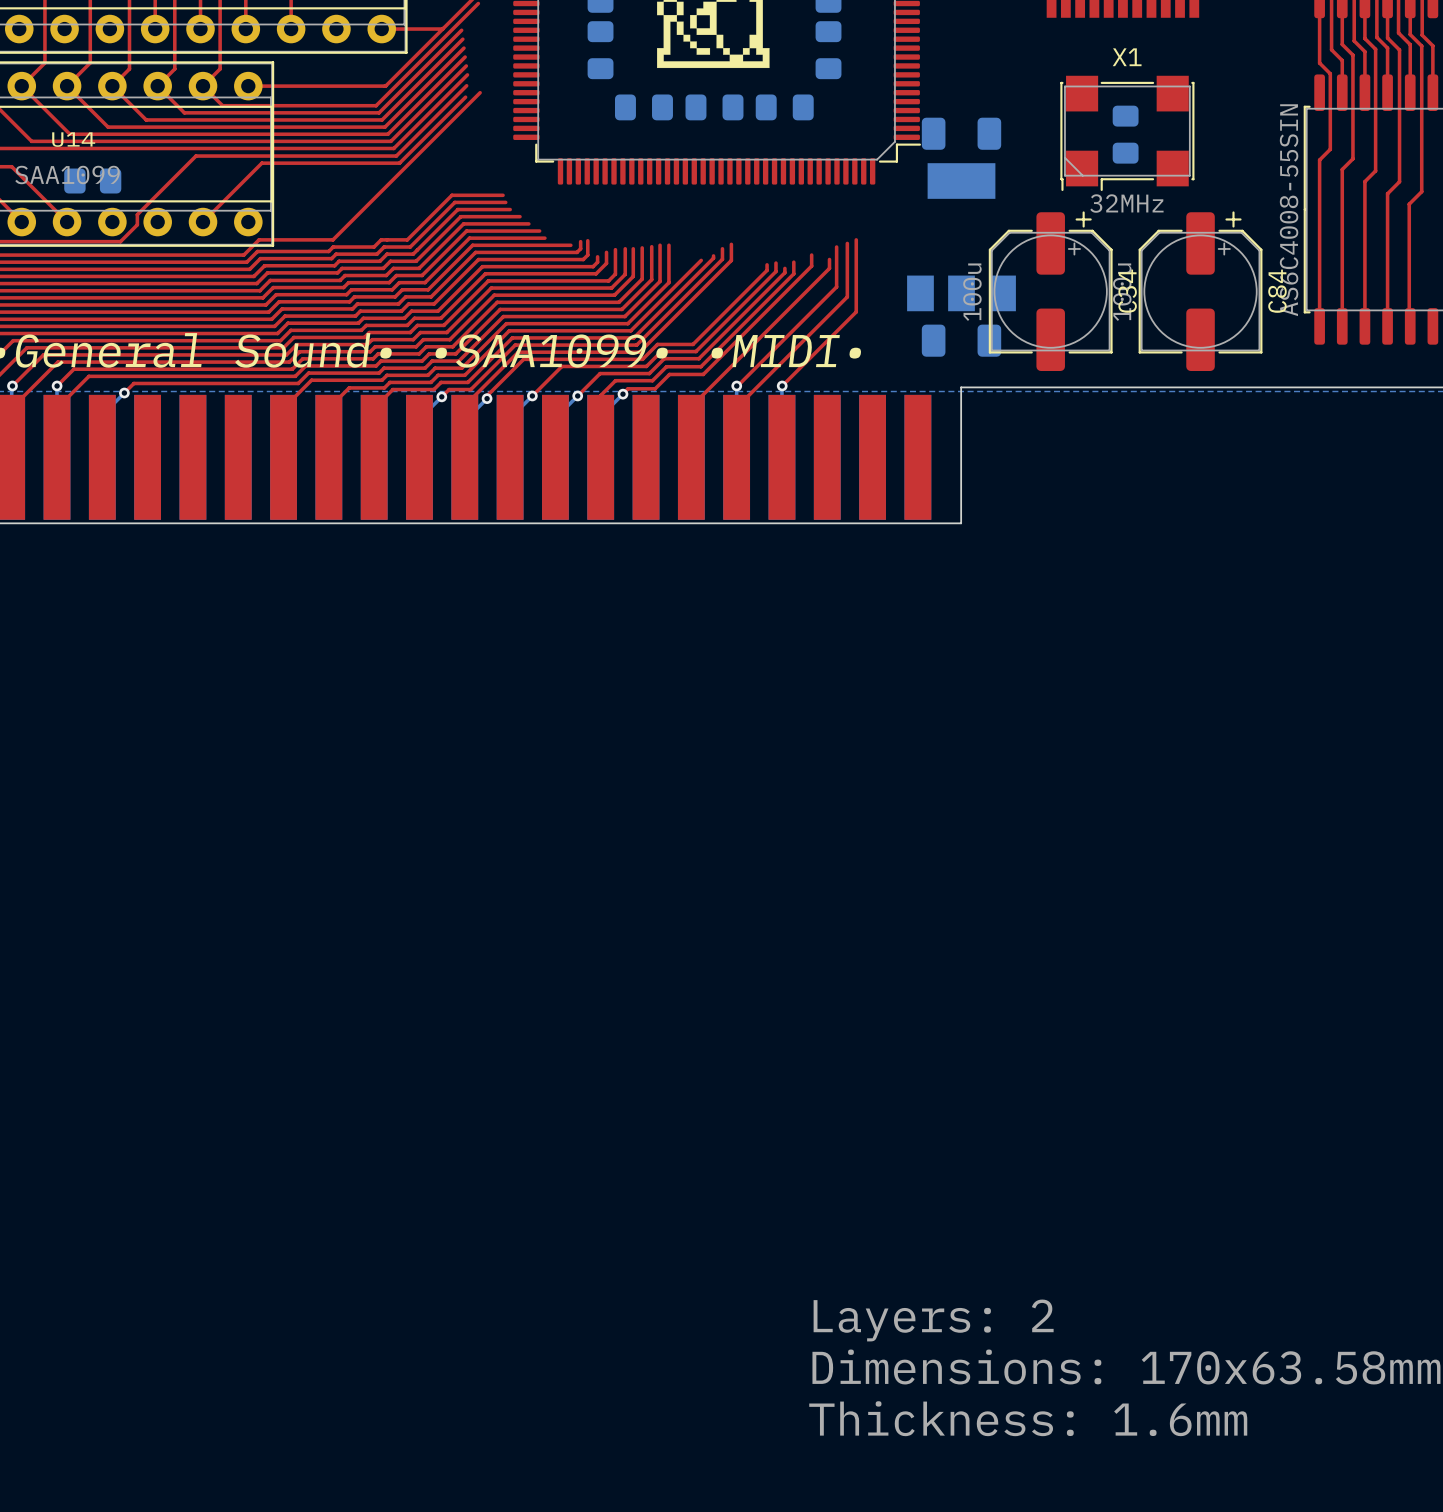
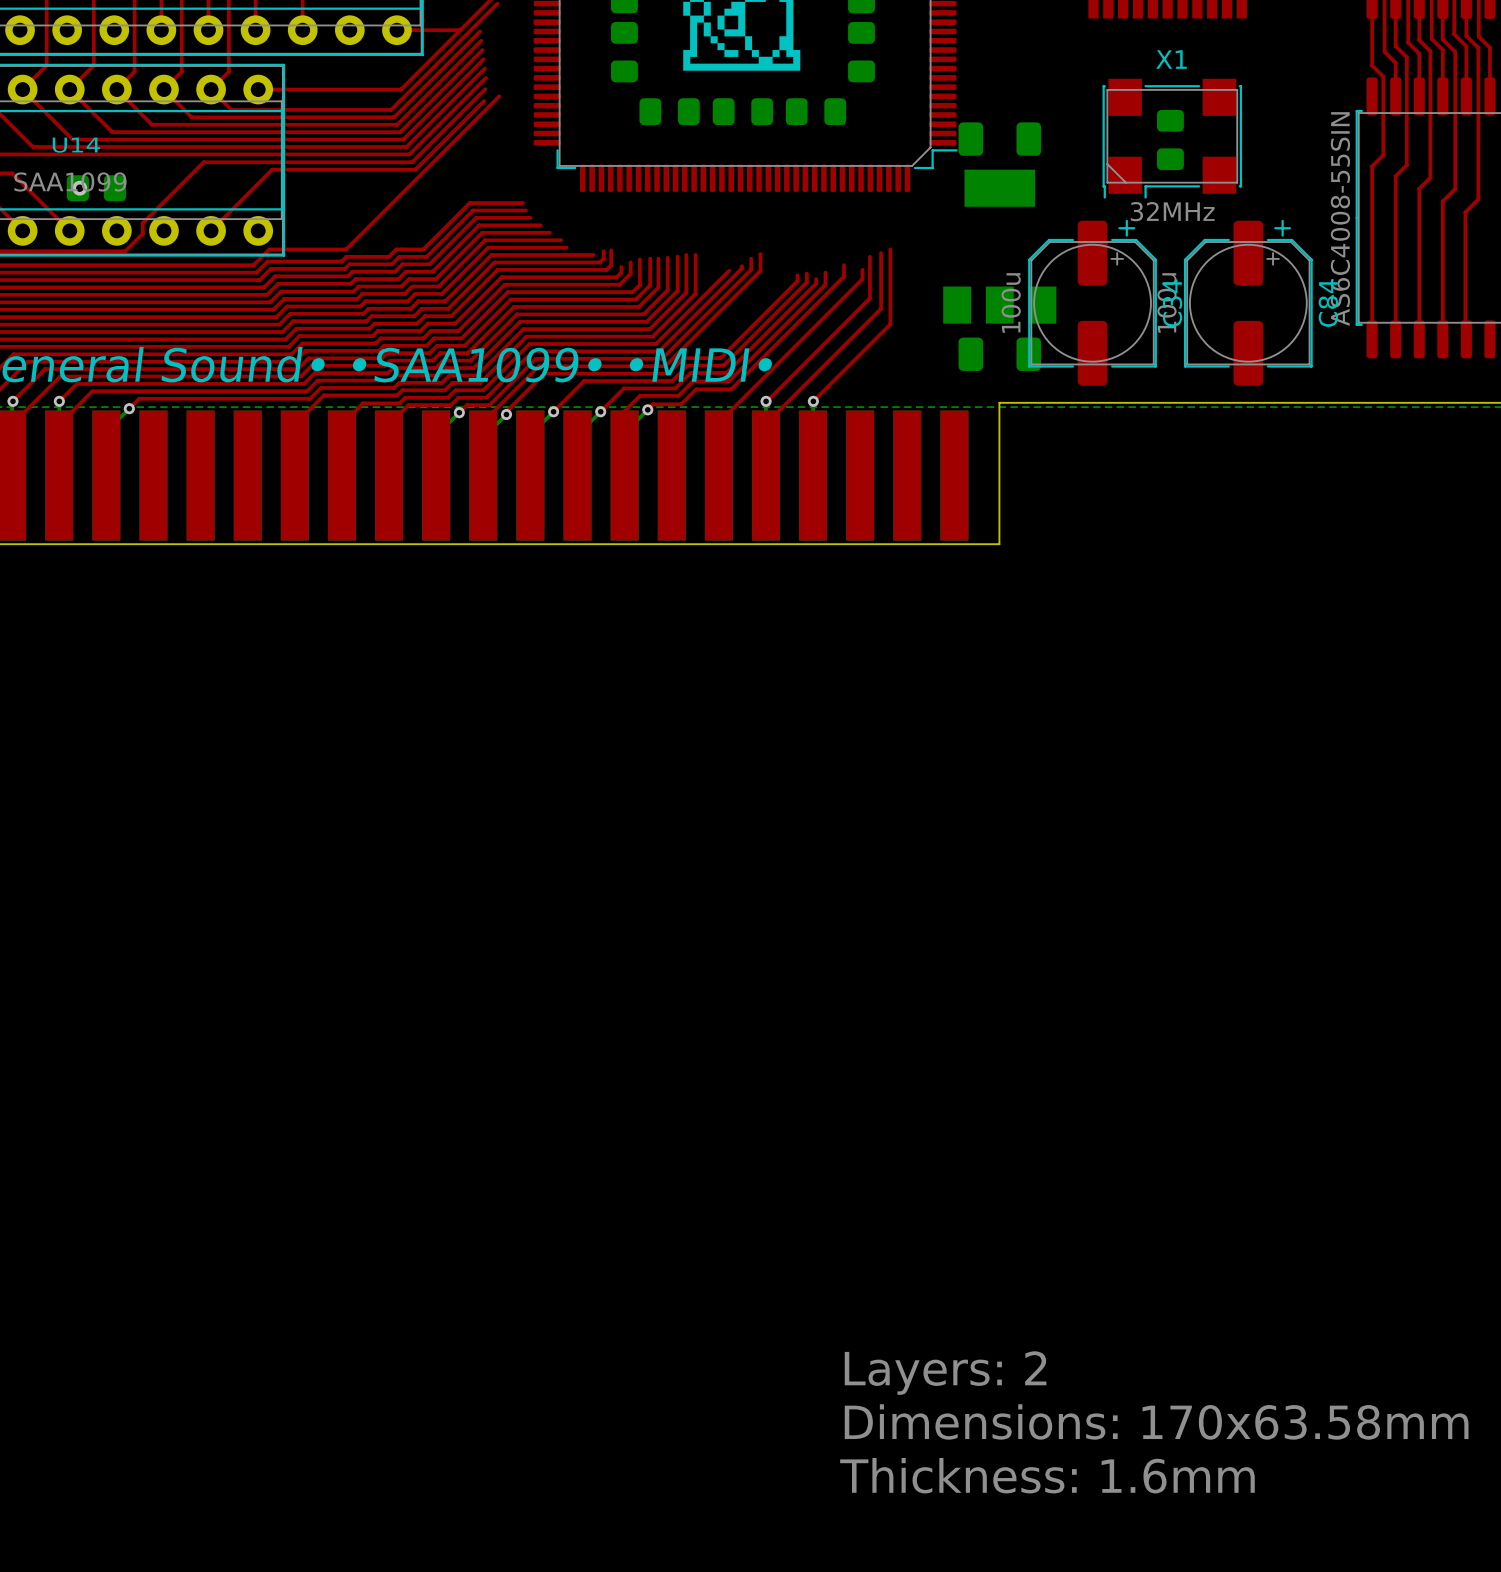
via: none -> (79, 188)

